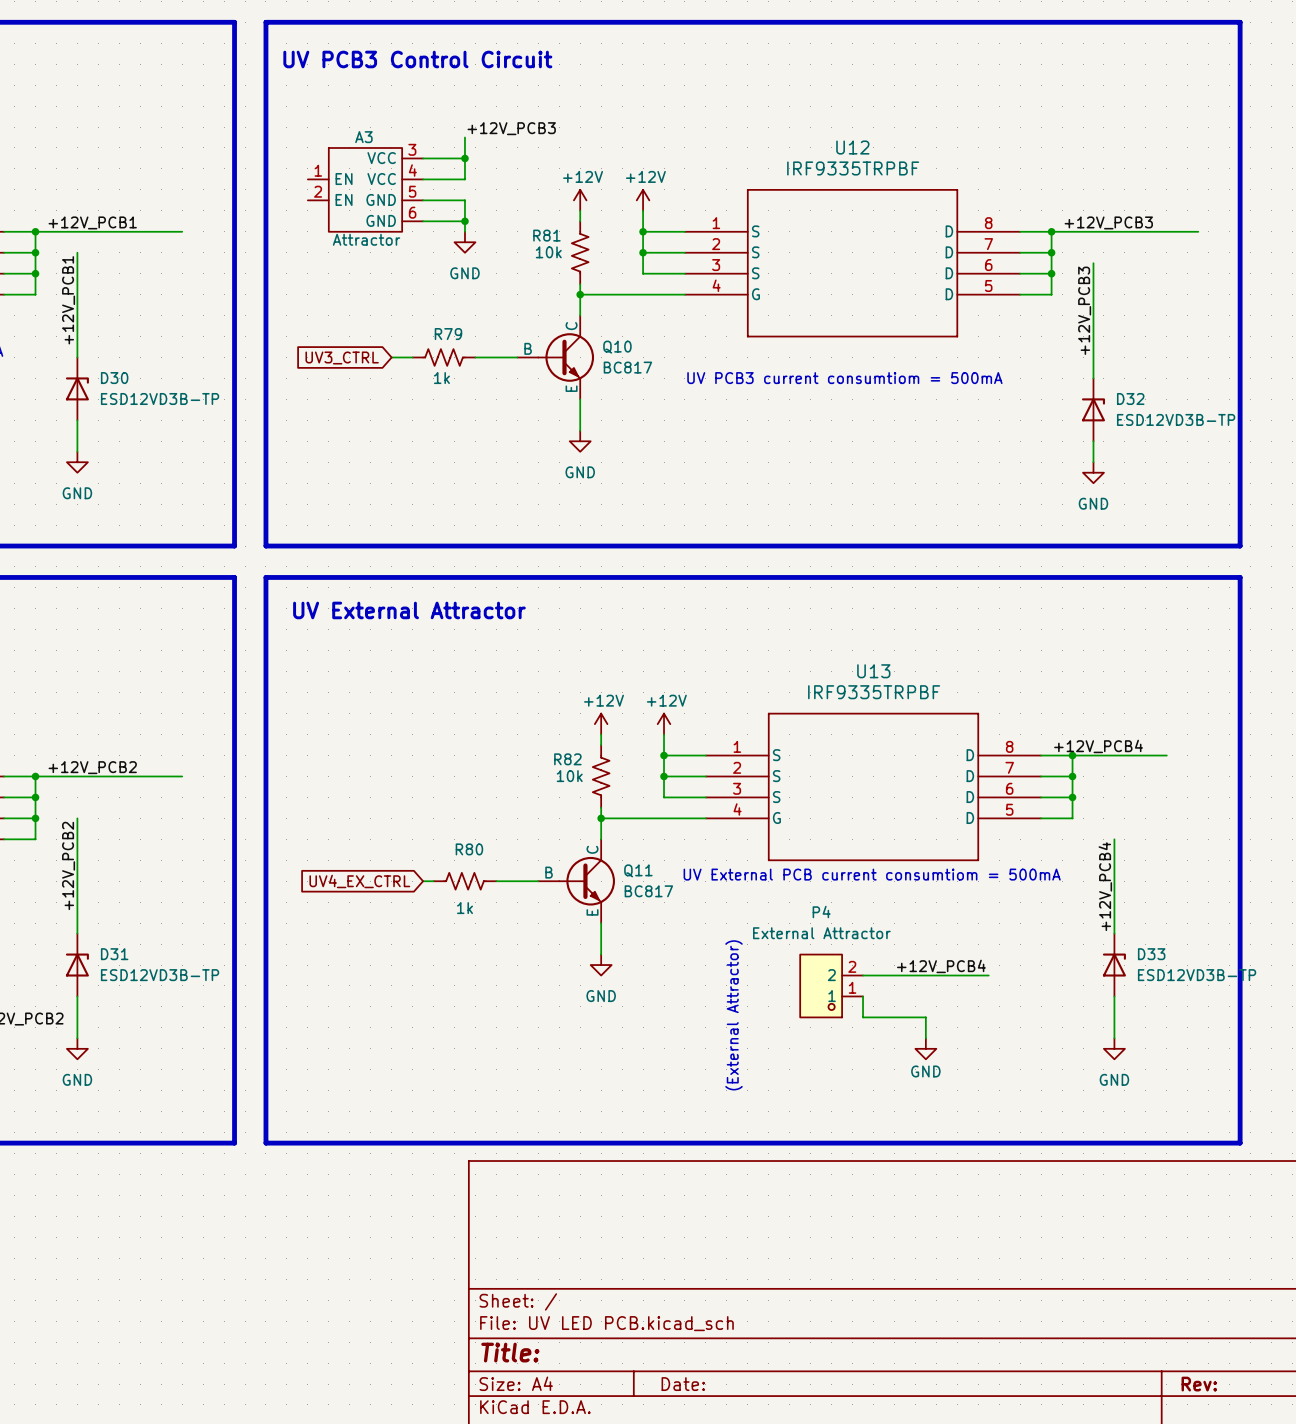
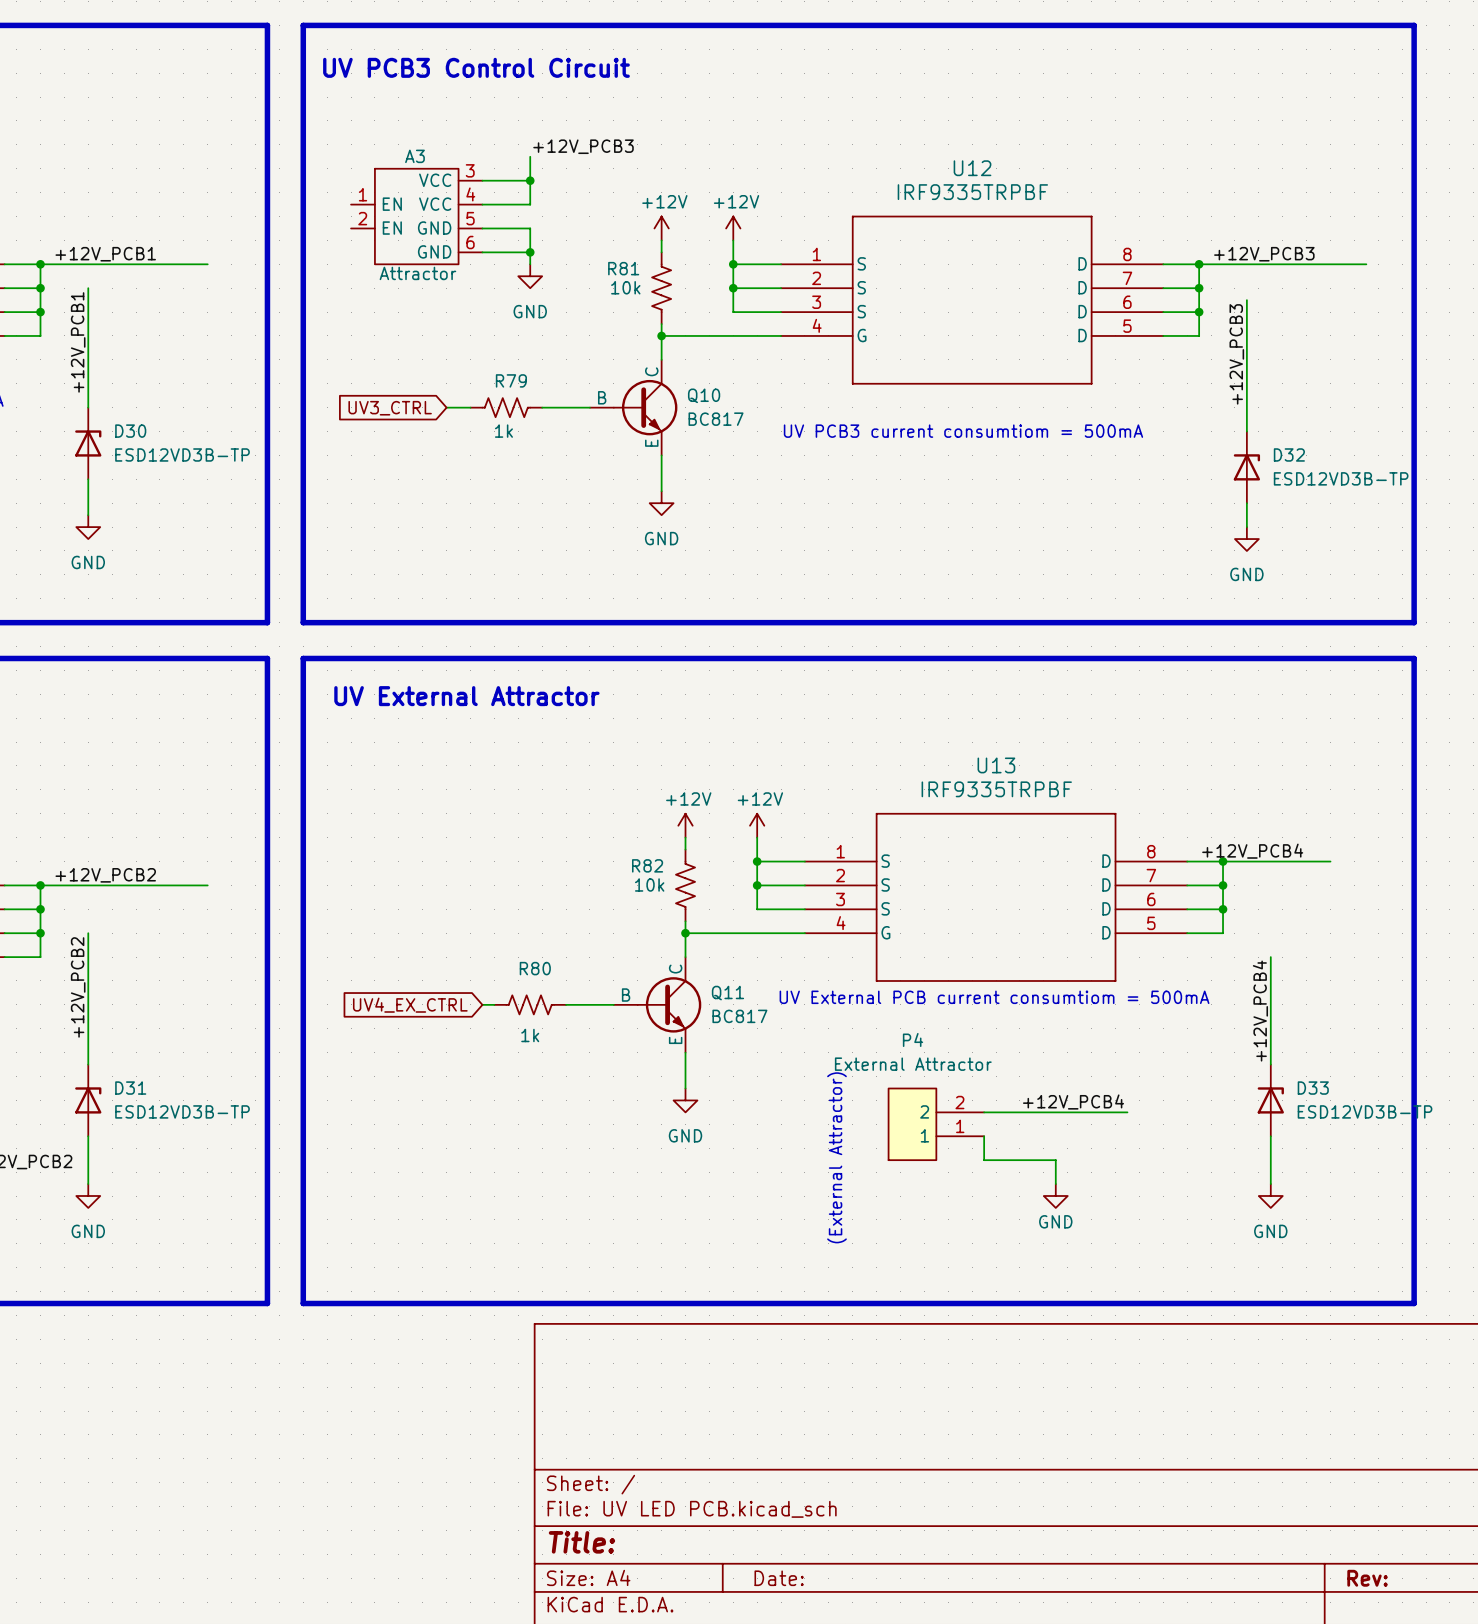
P4 symbol: [800, 954, 864, 1018] -> [888, 1088, 985, 1161]

